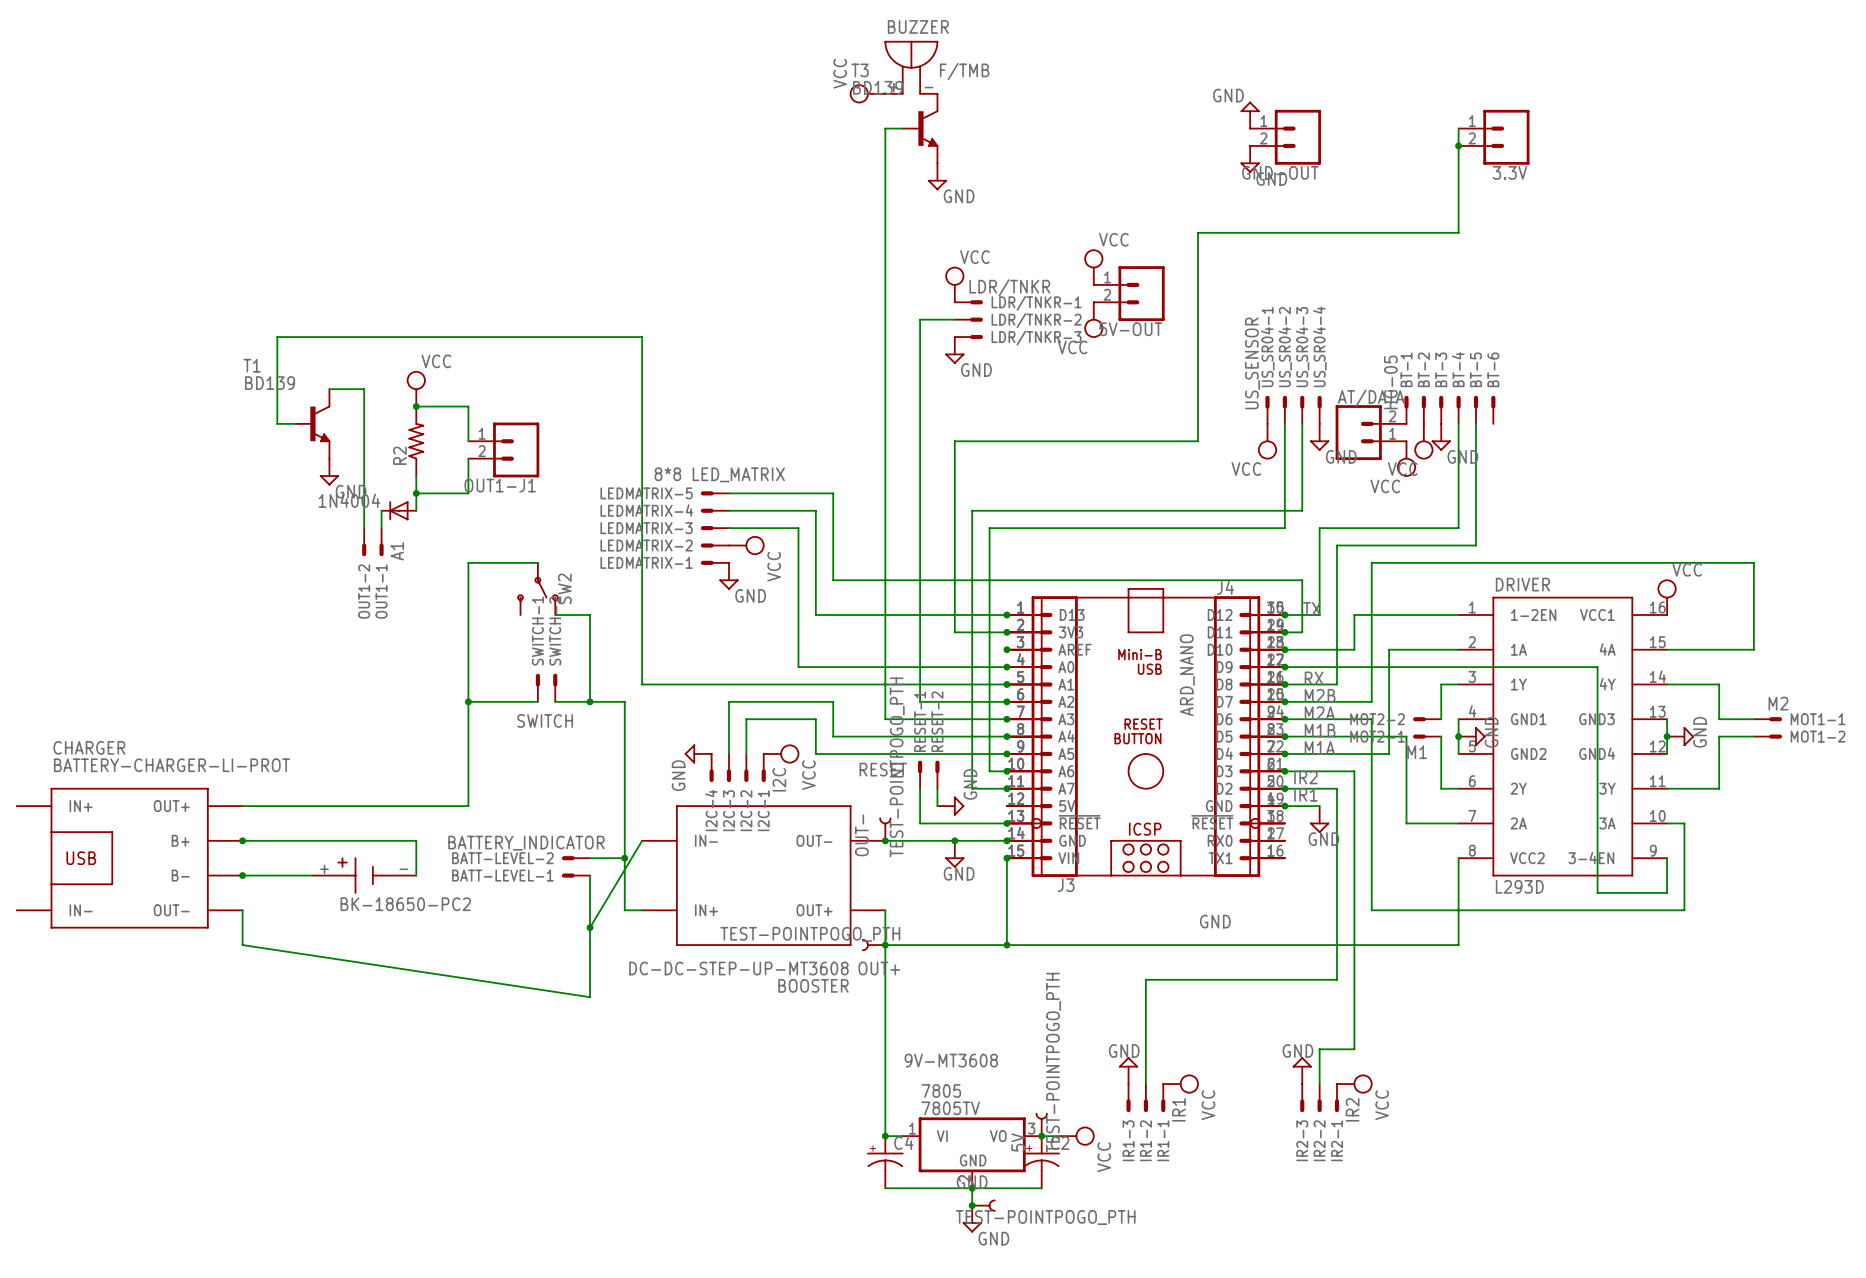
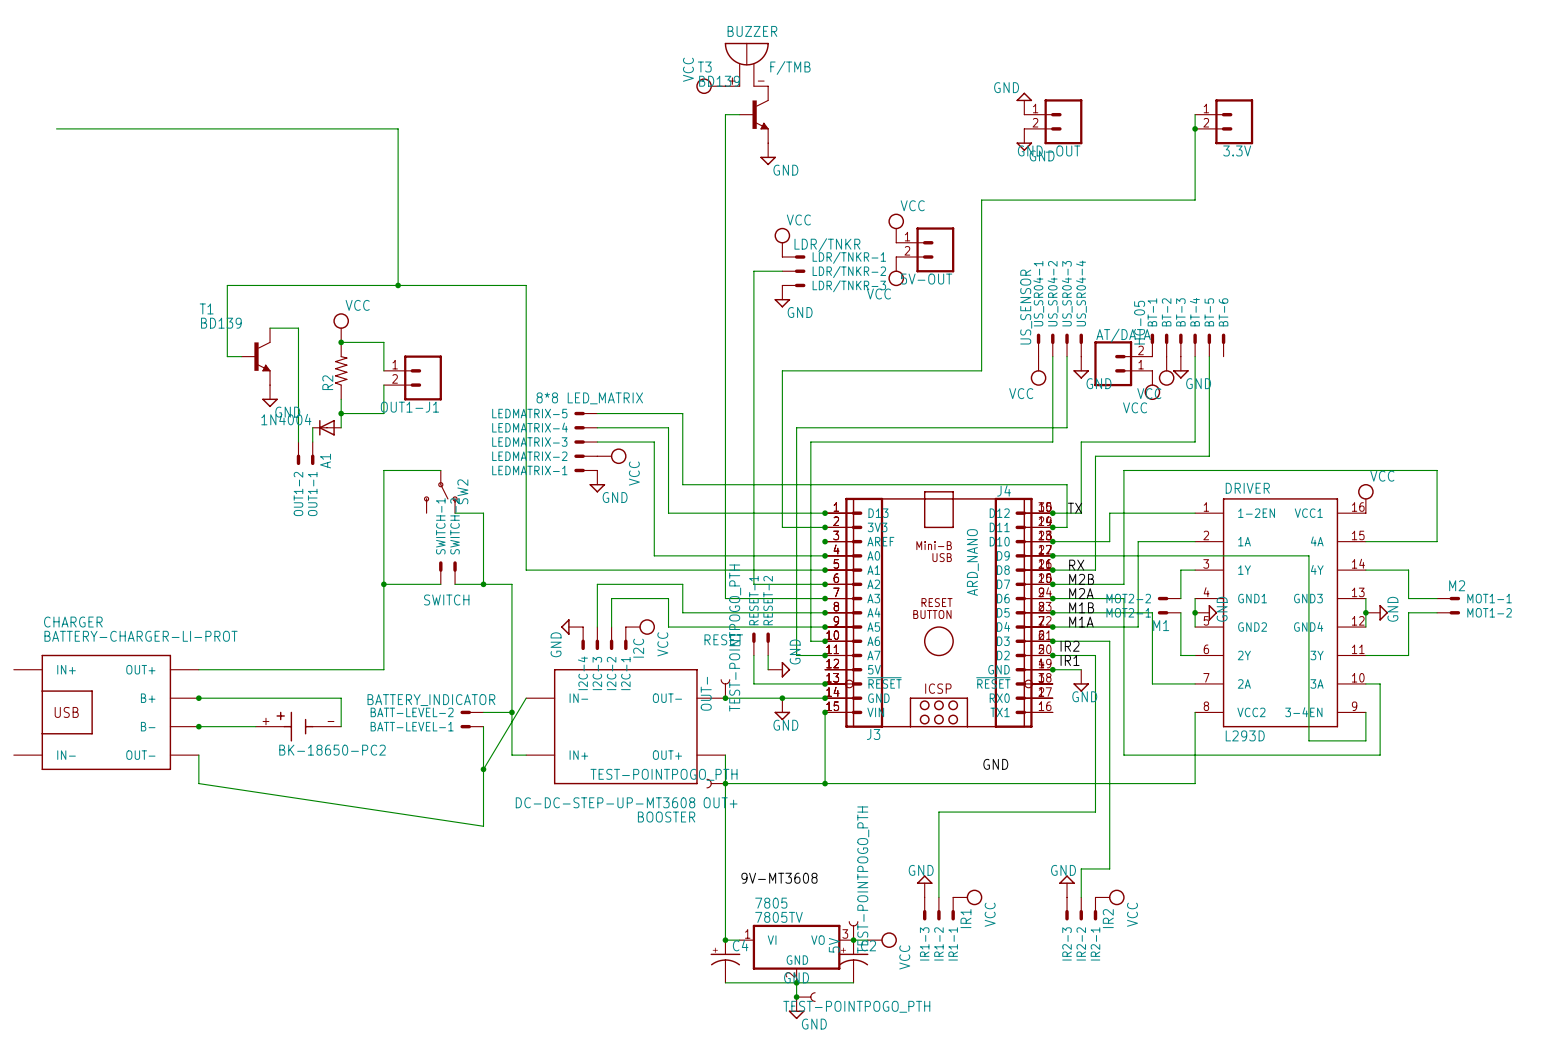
wire: none -> (56, 128) (398, 128) (398, 285)
junction: none -> (398, 285)

